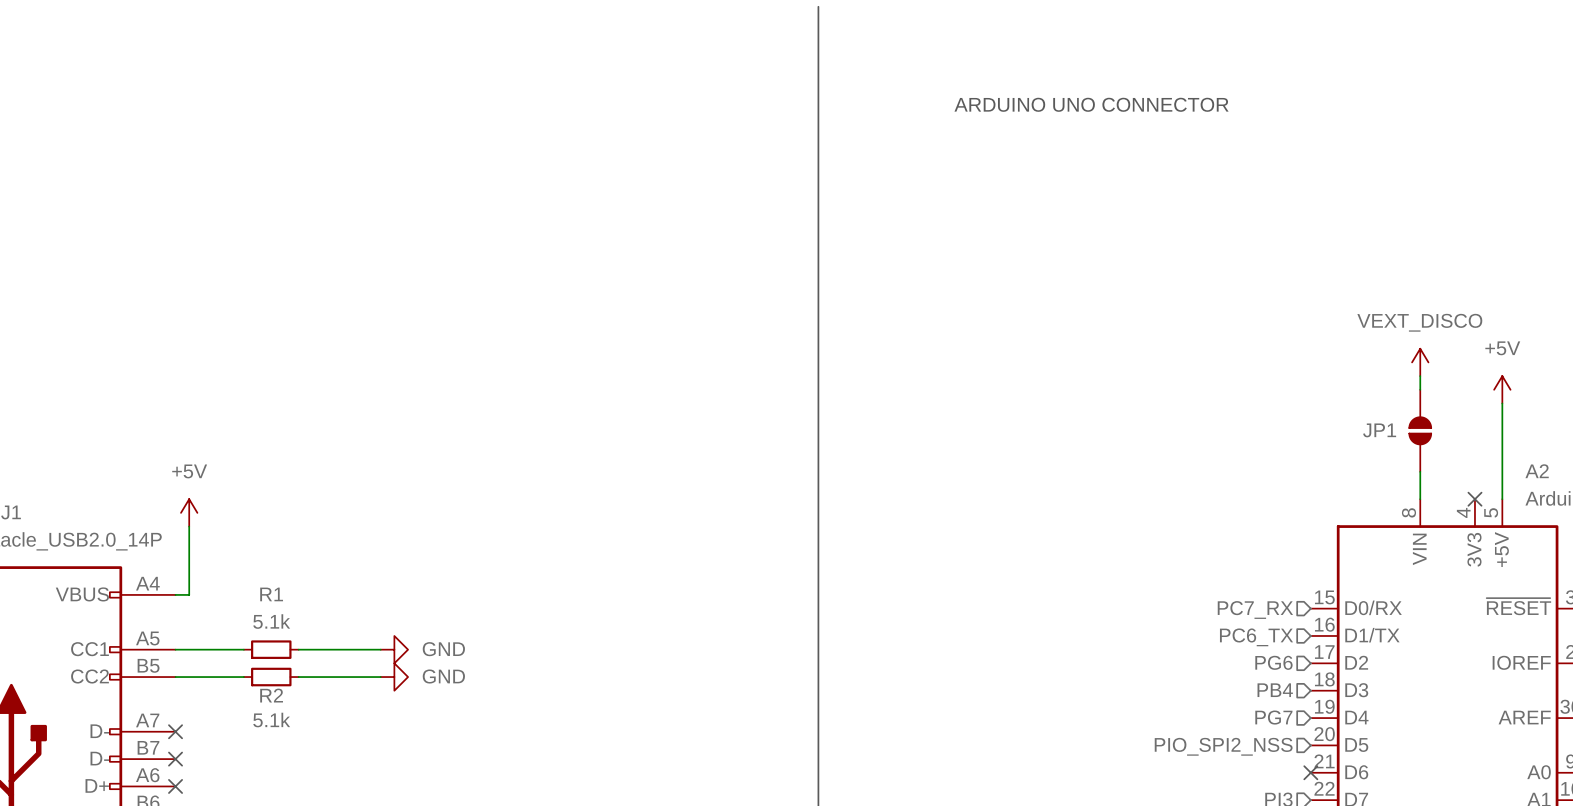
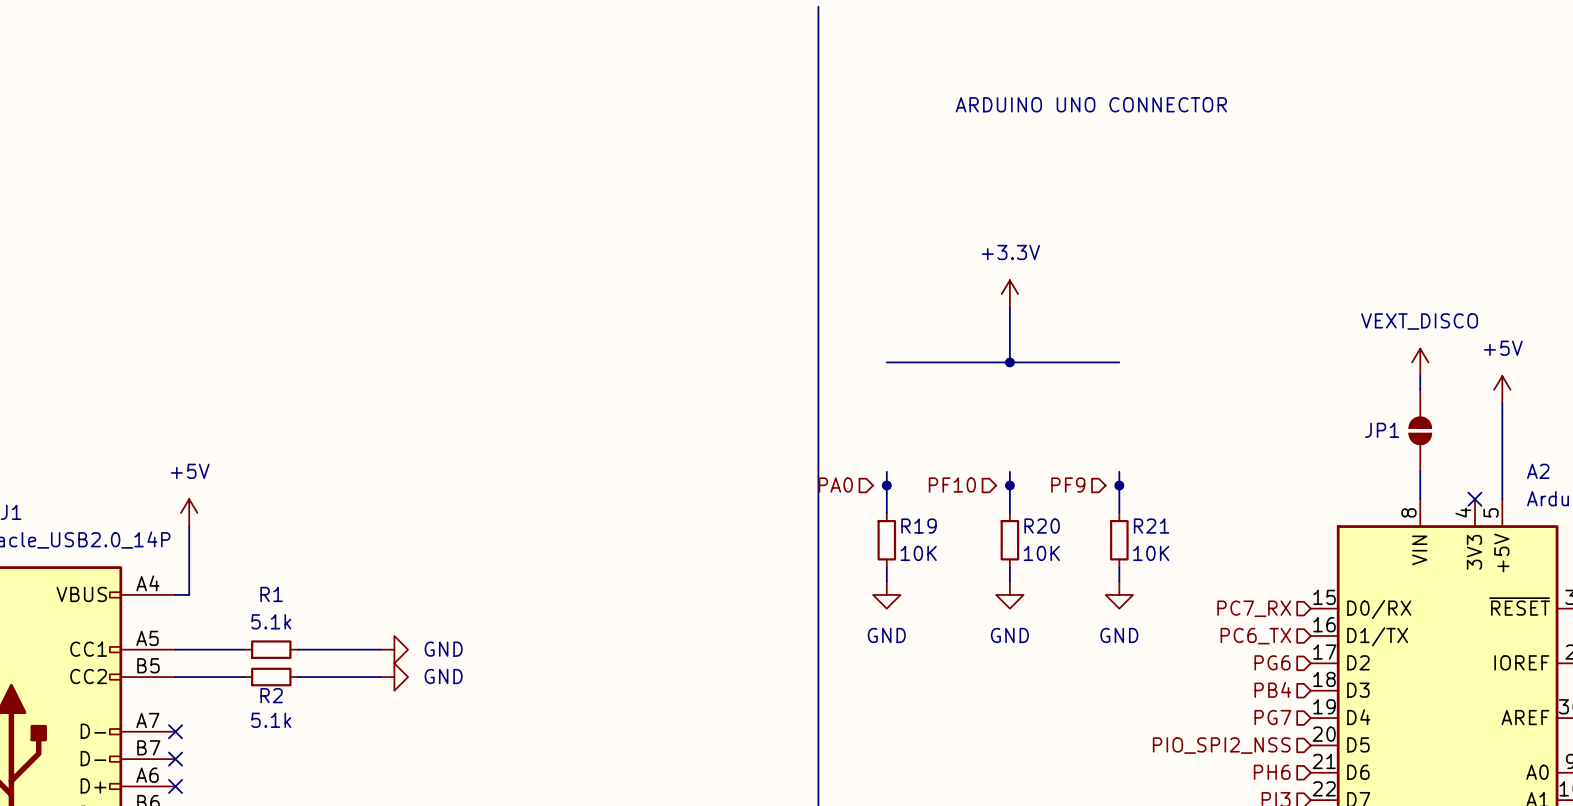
power symbol: none -> +3.3V (1009, 294)
wire: none -> (1009, 307) (1009, 362)
wire: none -> (886, 362) (1119, 362)
junction: none -> (1009, 362)
wire: none -> (886, 471) (886, 512)
wire: none -> (1009, 471) (1009, 512)
wire: none -> (1119, 471) (1119, 512)
hierarchical label: none -> PA0 (835, 485)
junction: none -> (886, 485)
hierarchical label: none -> PF10 (952, 485)
junction: none -> (1009, 485)
hierarchical label: none -> PF9 (1068, 485)
junction: none -> (1119, 485)
R19: none -> 10K (886, 540)
R20: none -> 10K (1009, 540)
R21: none -> 10K (1119, 540)
wire: none -> (886, 567) (886, 581)
wire: none -> (1009, 567) (1009, 581)
wire: none -> (1119, 567) (1119, 581)
power symbol: none -> GND (886, 594)
power symbol: none -> GND (1009, 594)
power symbol: none -> GND (1119, 594)
hierarchical label: none -> PH6 (1272, 772)
no-connect mark: (1310, 772) -> none

